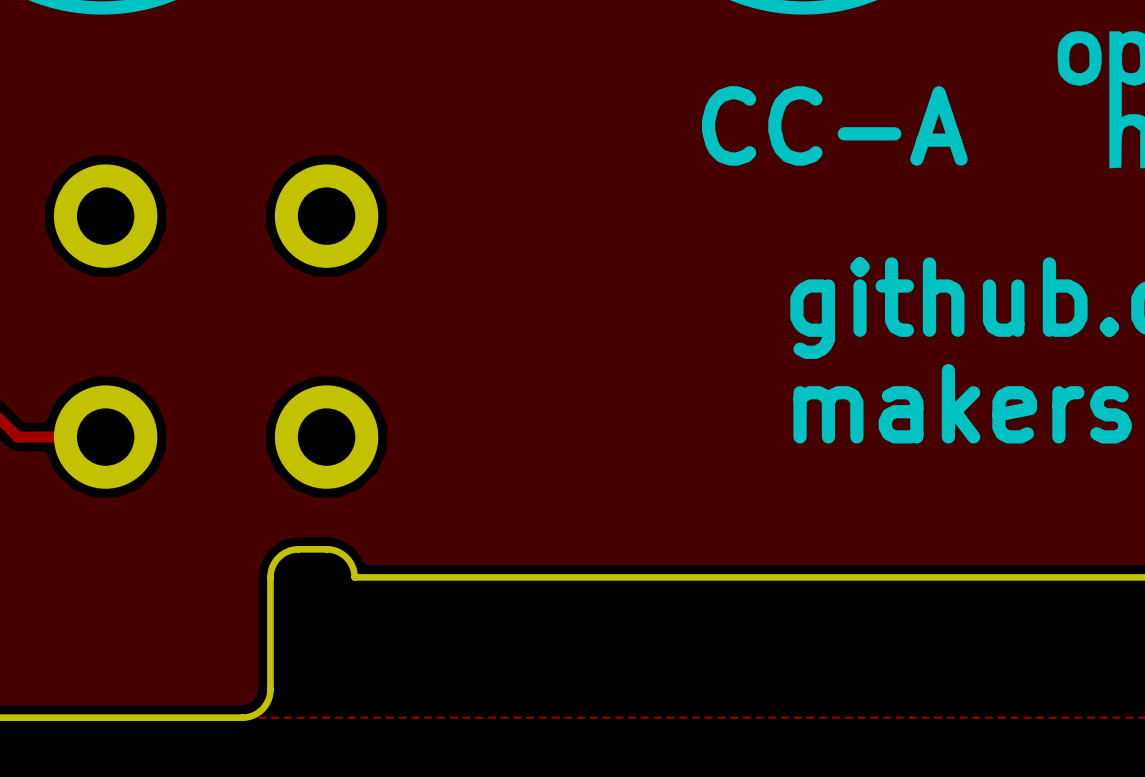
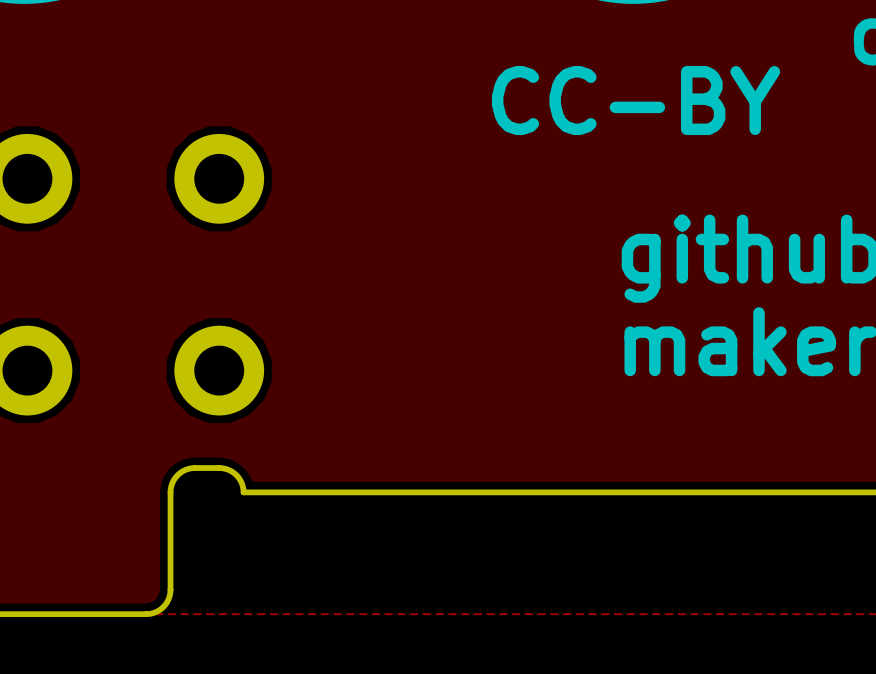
text: CC-A (834, 125) -> CC-BY (636, 100)

